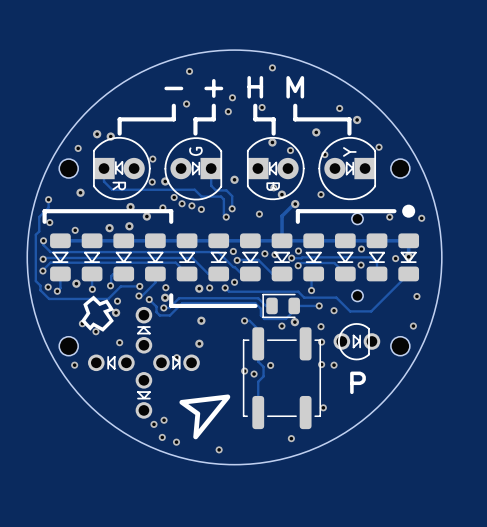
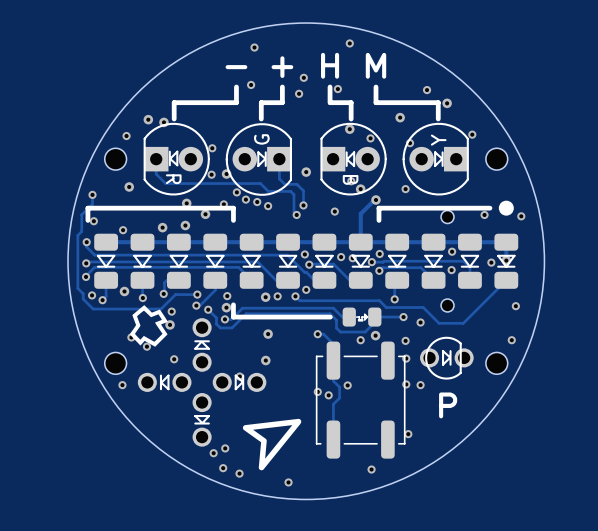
part footprint: [262, 293, 300, 319] -> [342, 307, 382, 327]

